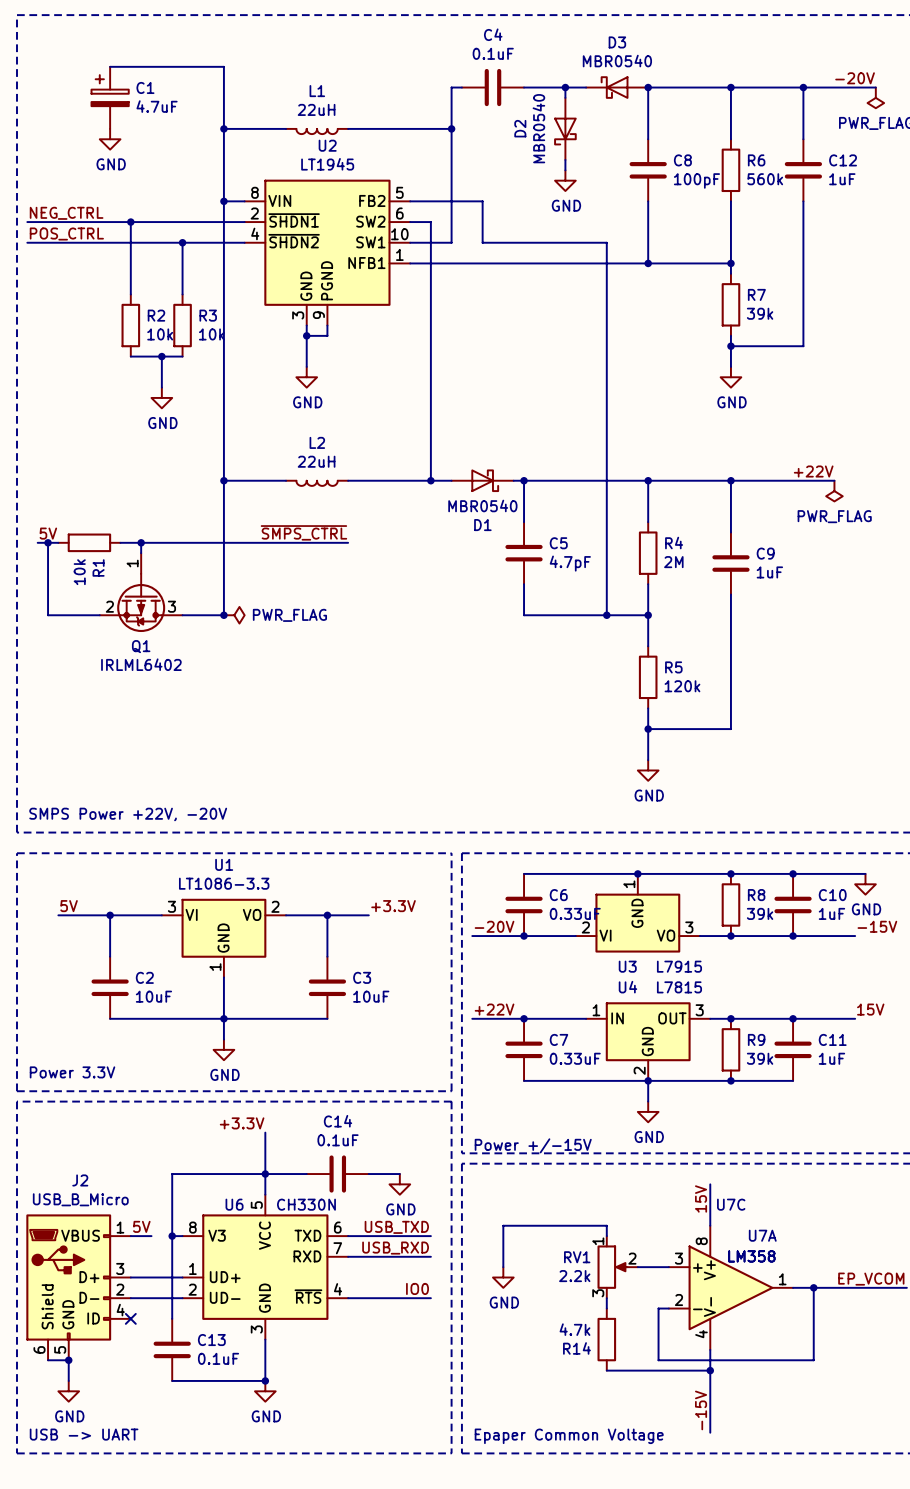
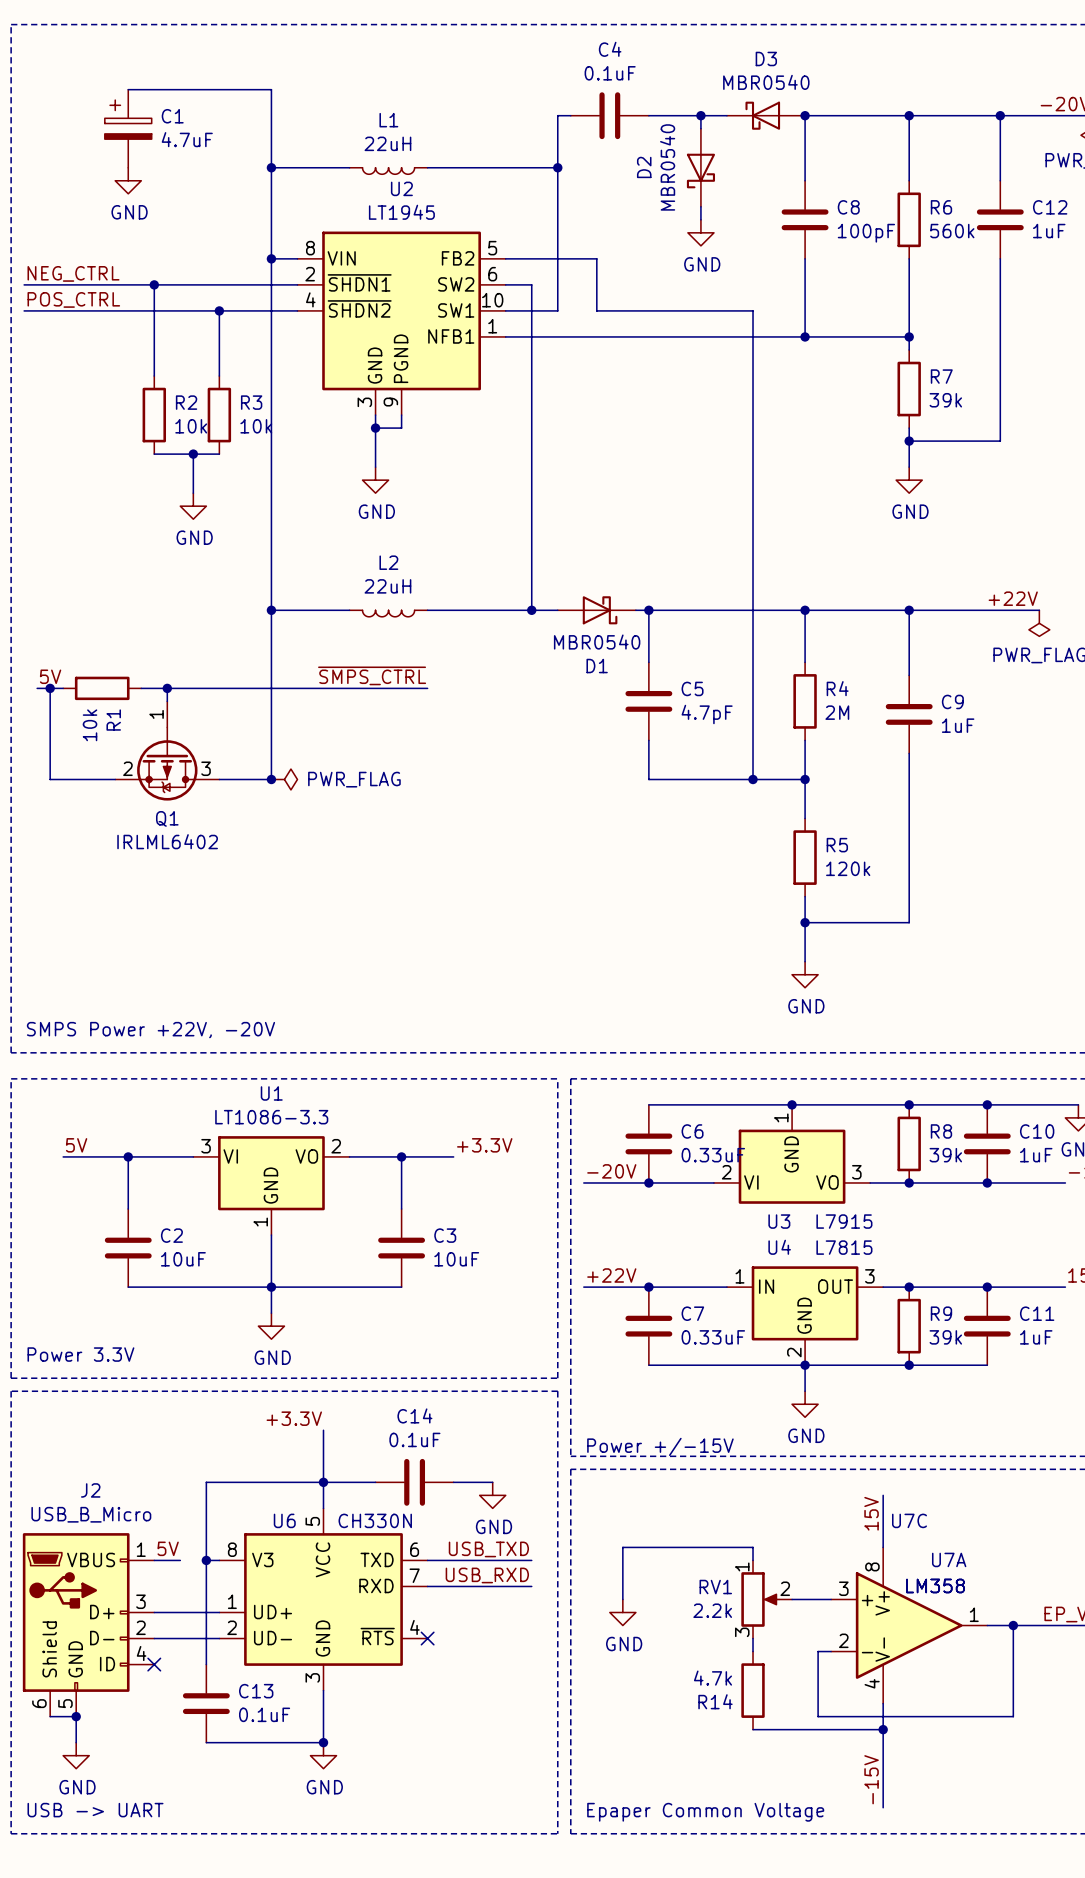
label: IO0 (417, 1288) -> none
wire: (348, 1298) (430, 1298) -> none
no-connect mark: none -> (427, 1638)

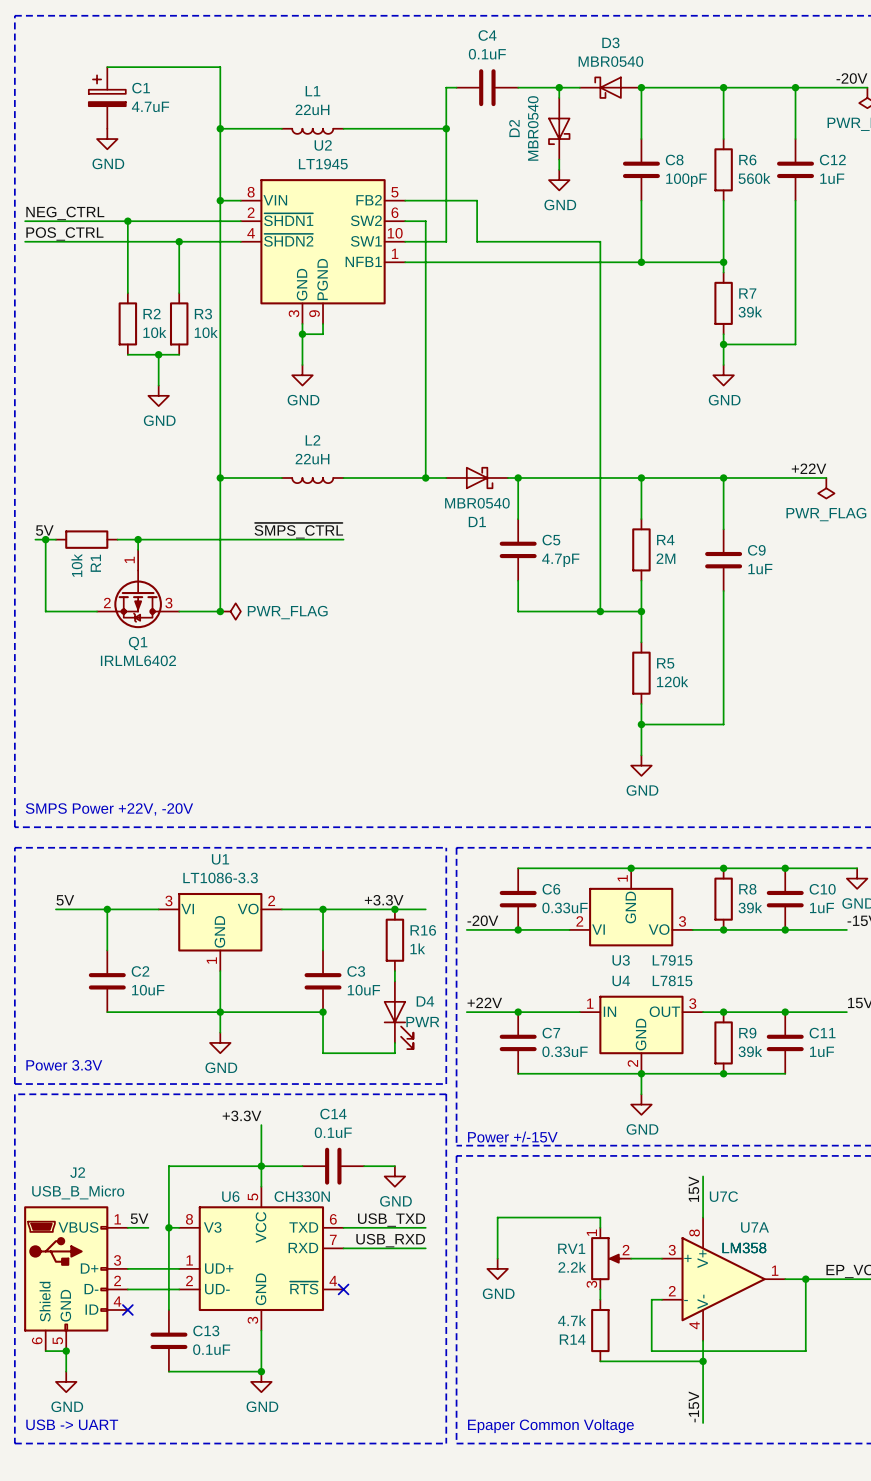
wire: none -> (364, 909) (425, 909)
junction: none -> (394, 909)
R16: none -> 1k (394, 940)
wire: none -> (394, 971) (394, 981)
wire: none -> (323, 1012) (323, 1053) (394, 1053) (394, 1042)
junction: none -> (323, 1012)
D4: none -> PWR (398, 1015)

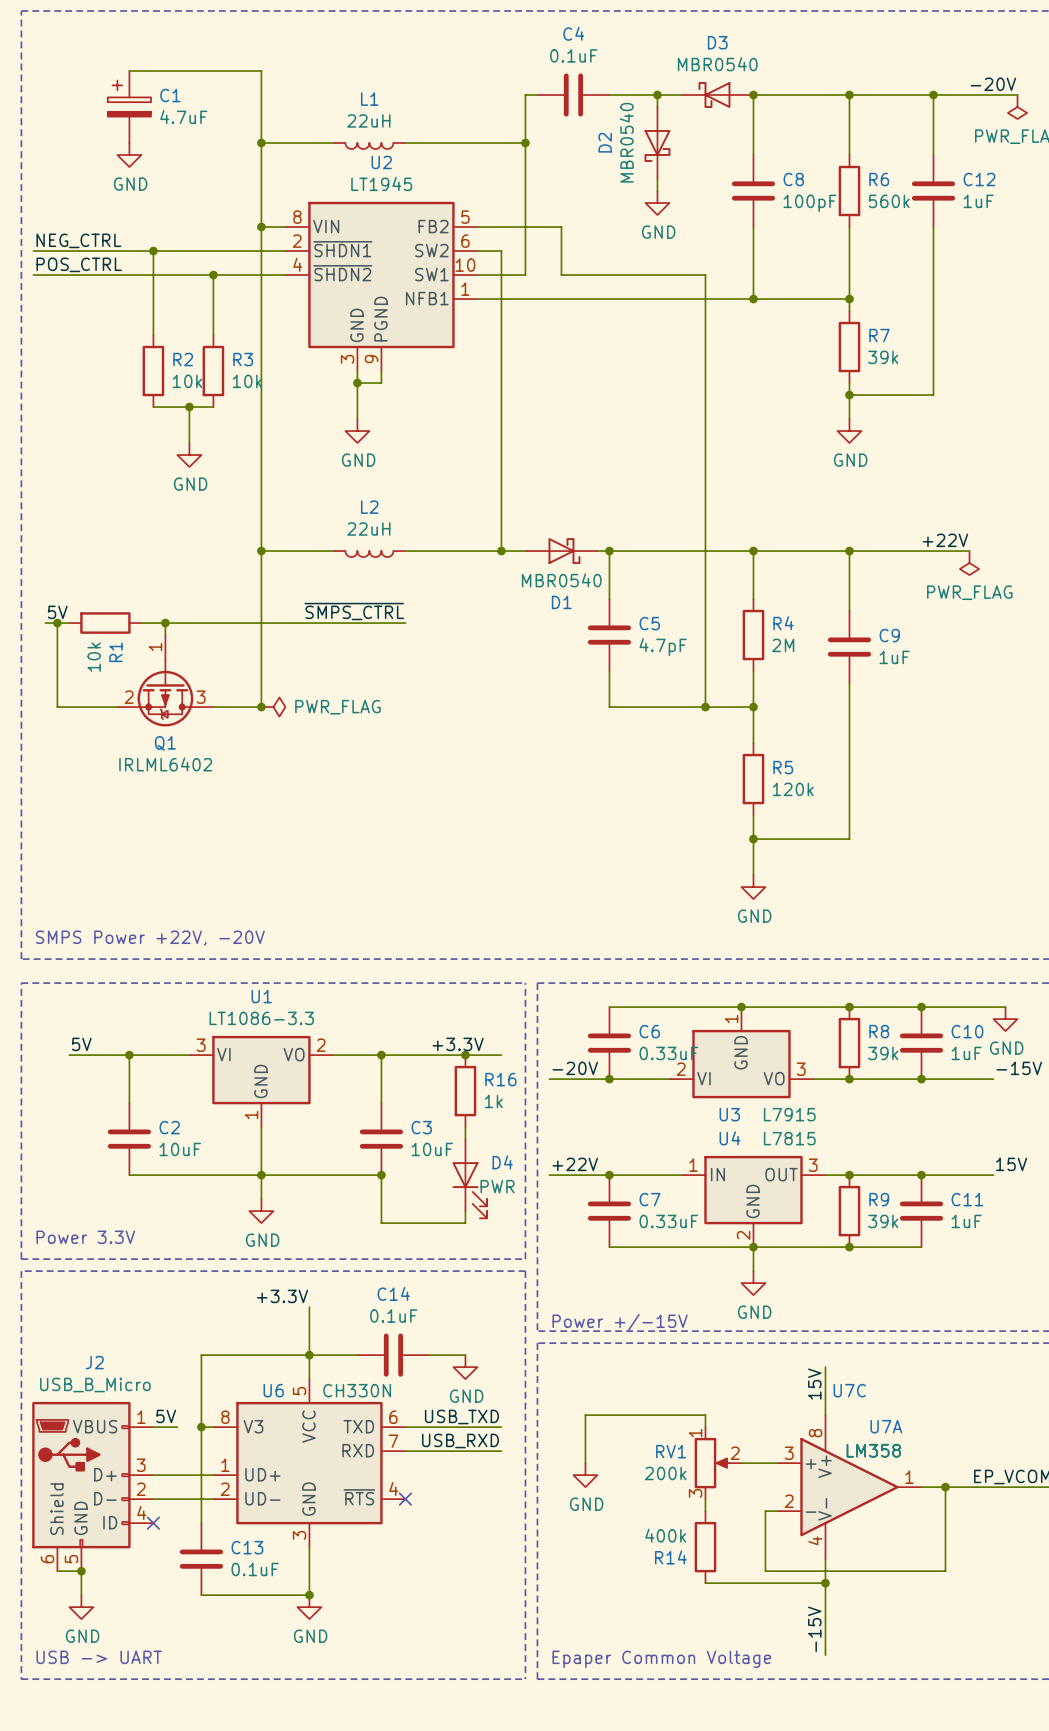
RV1 value: 2.2k (572, 1267) -> 200k (665, 1473)
R14 value: 4.7k (572, 1320) -> 400k (665, 1535)

